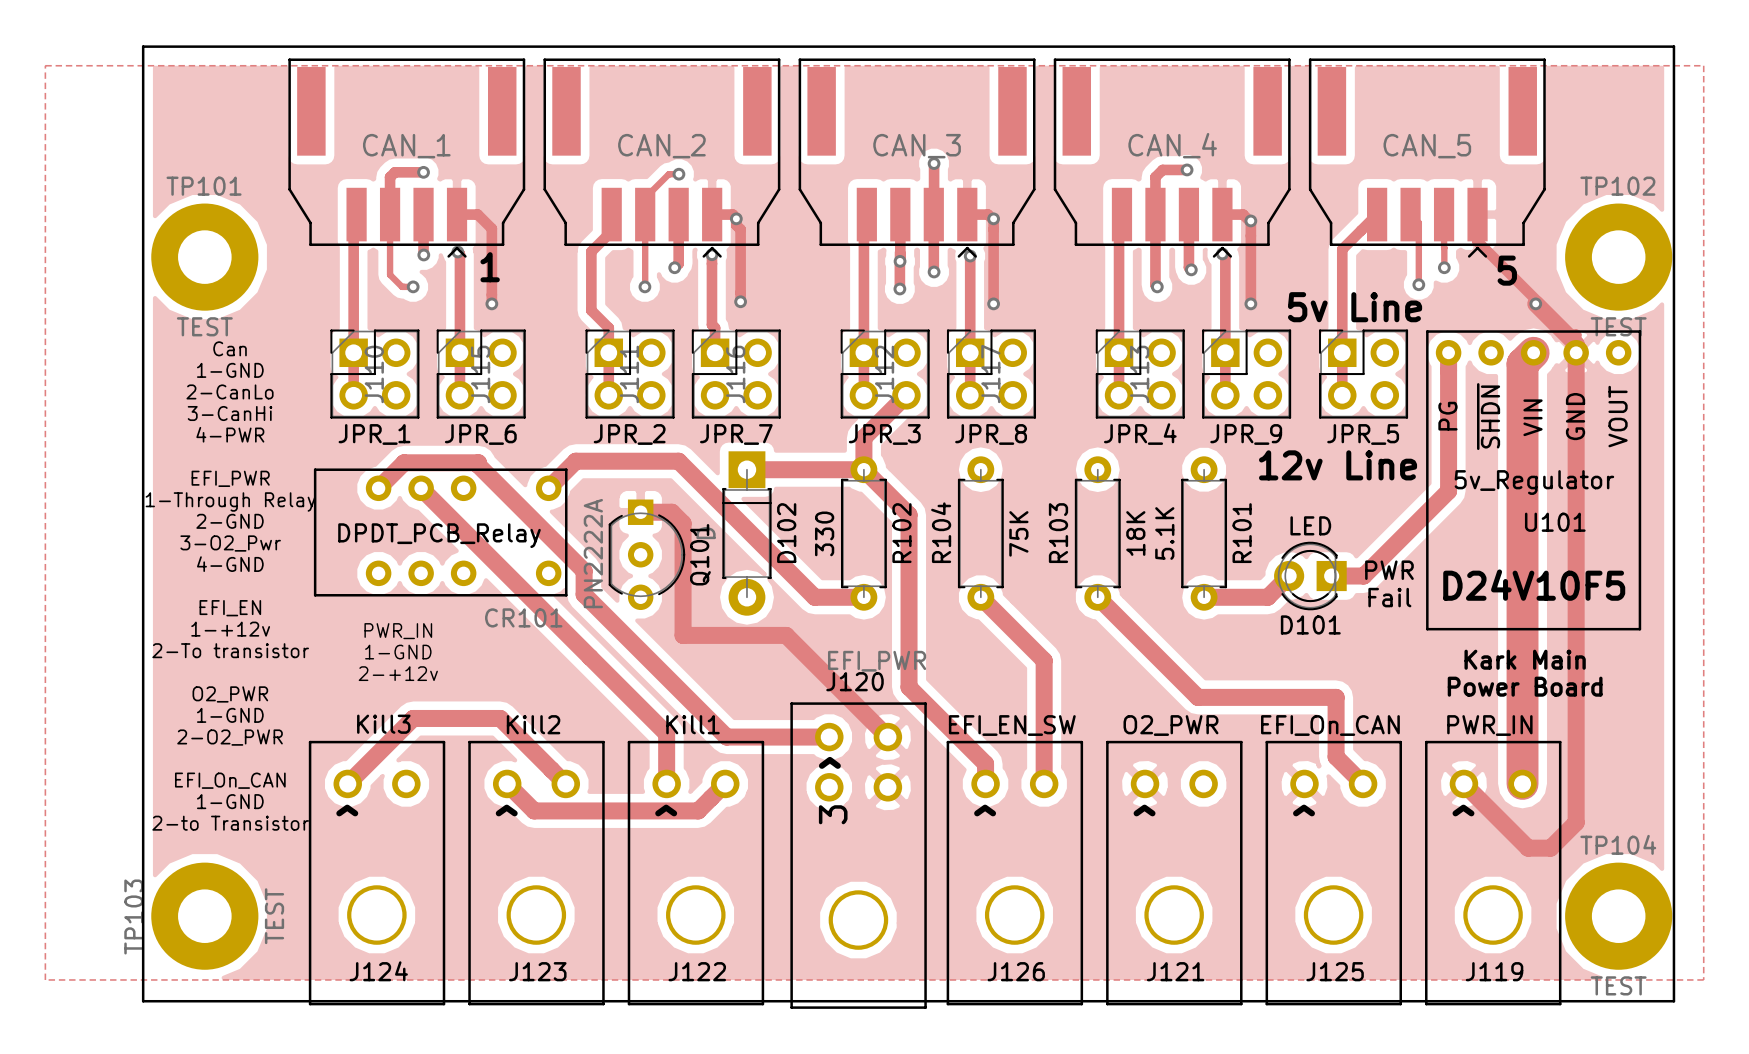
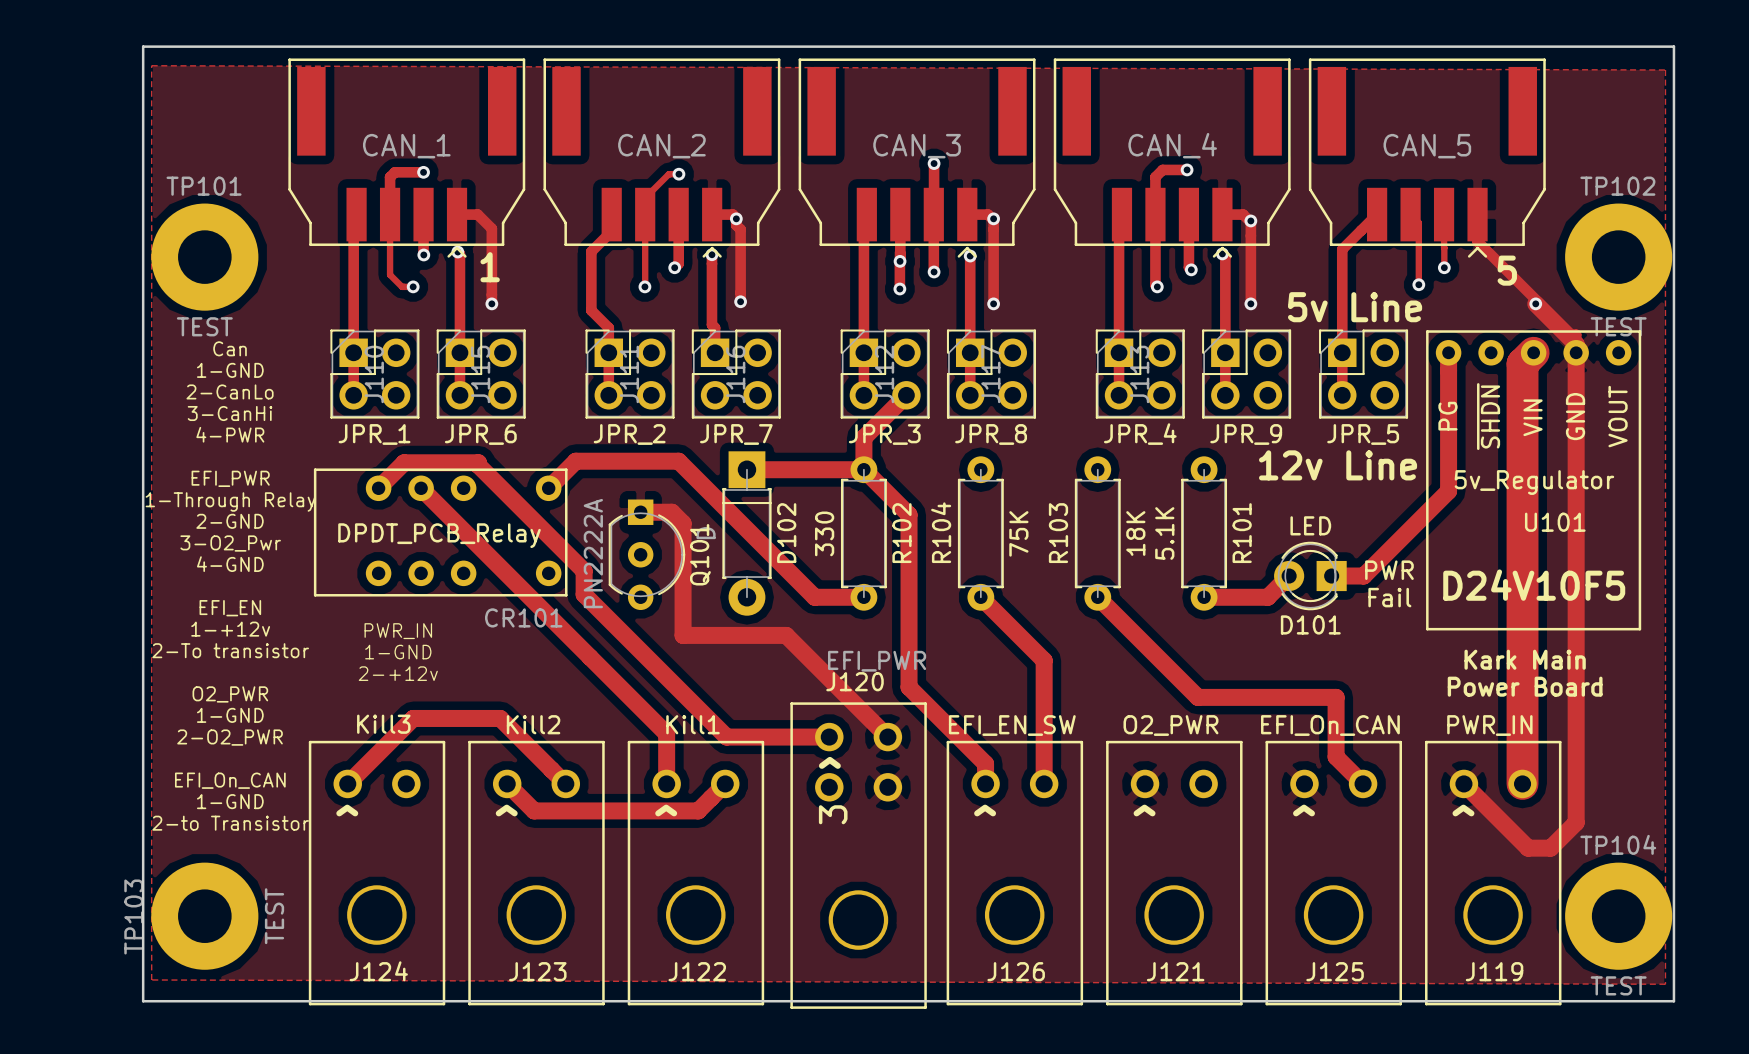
zone outline: (45, 65) (45, 979) (1703, 979) (1703, 65) (45, 65) -> (151, 65) (151, 979) (1665, 984) (1665, 70) (151, 65)

